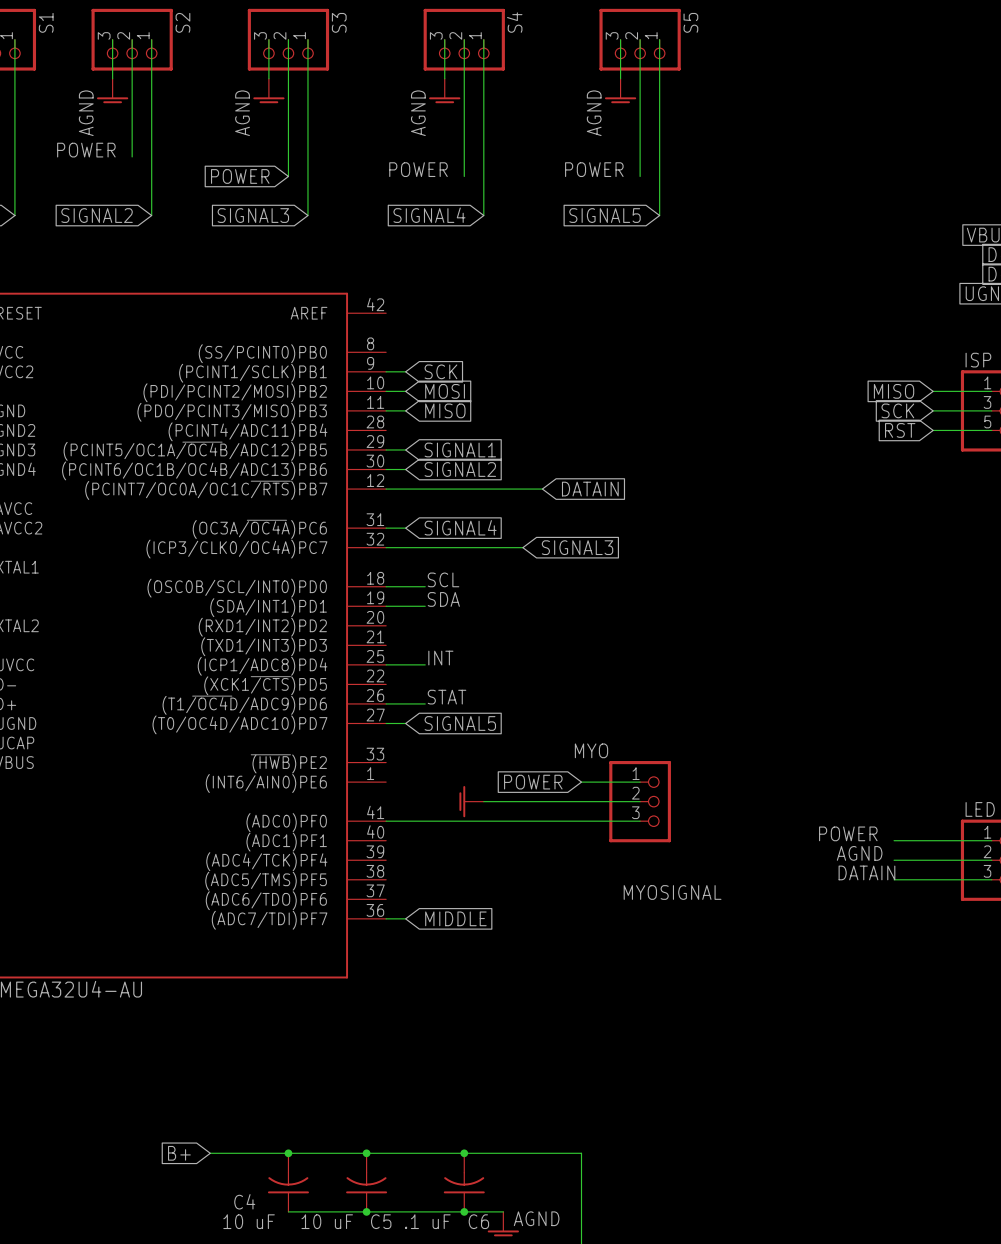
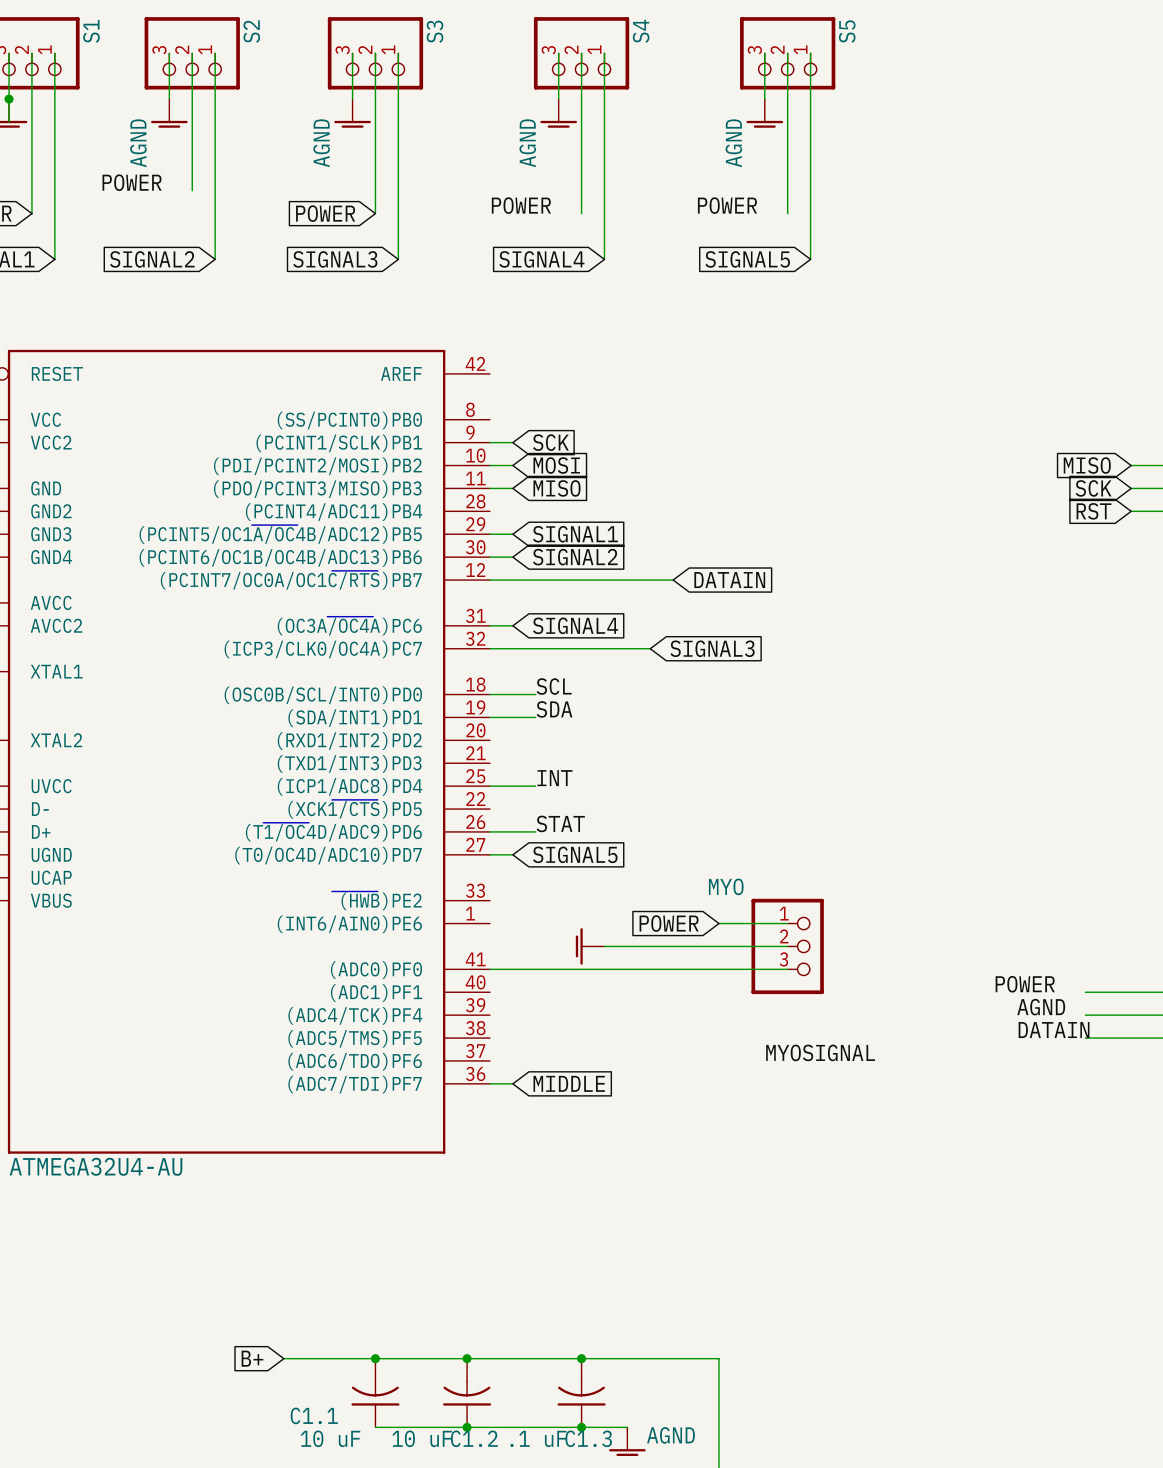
C4 name: C4 (244, 1201) -> C1.1 (314, 1415)
C5 name: C5 (381, 1221) -> C1.2 (474, 1438)
C6 name: C6 (478, 1221) -> C1.3 (588, 1438)

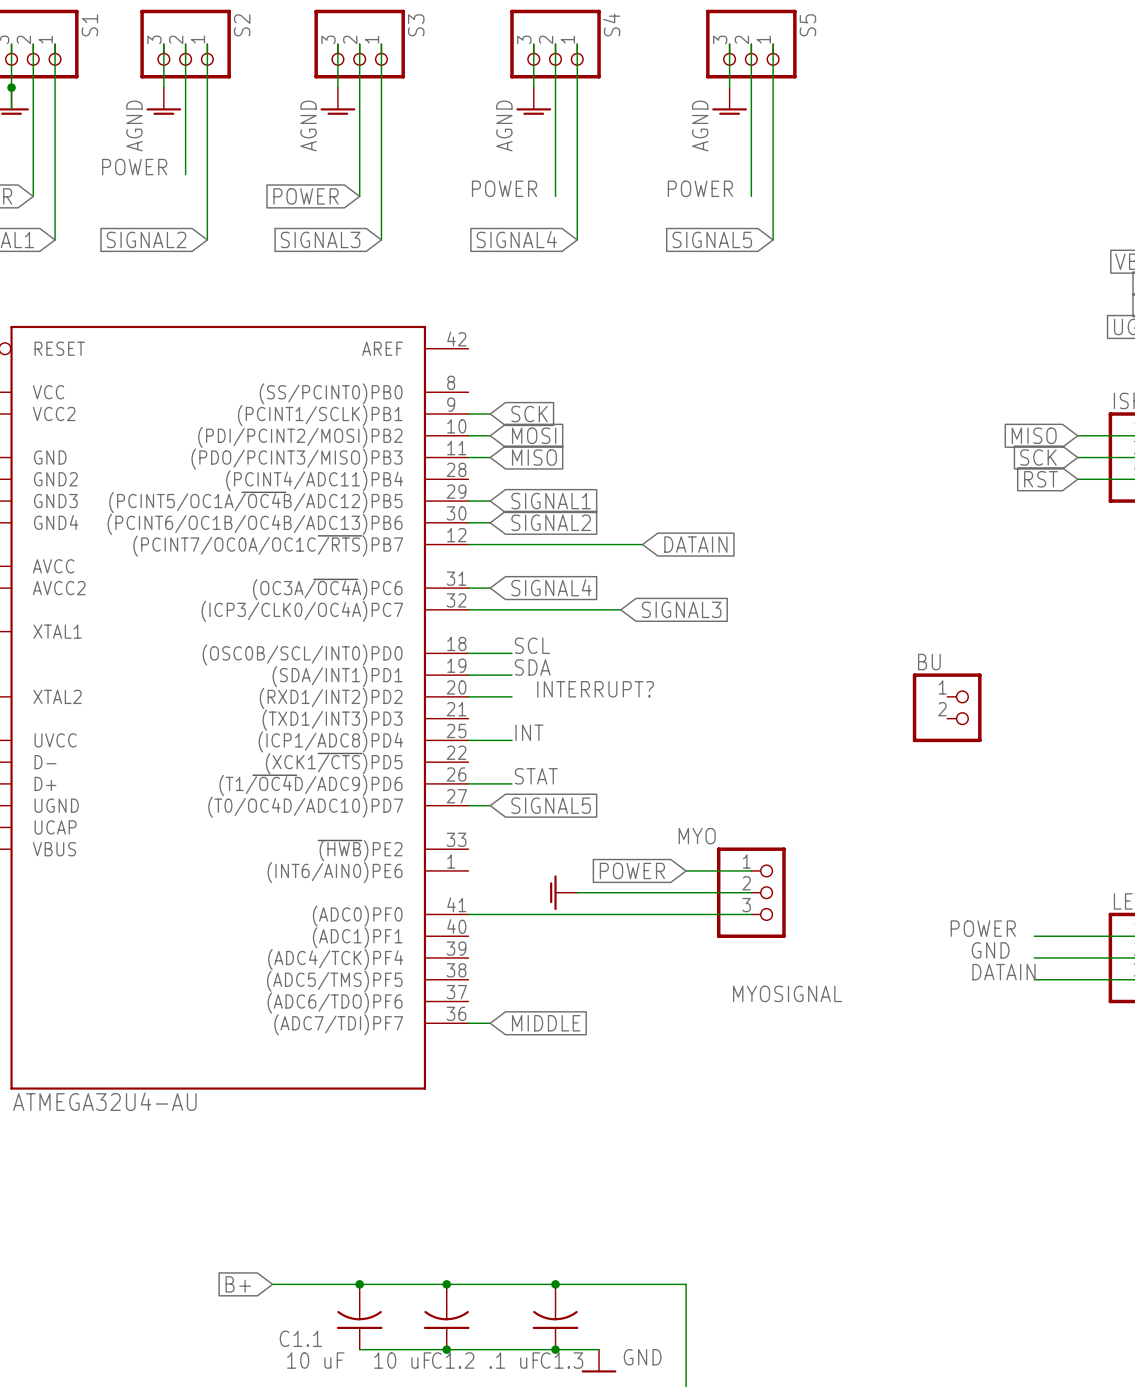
label: none -> INTERRUPT? (595, 689)
wire: none -> (468, 696) (512, 696)
BU: none -> (947, 707)
label: AGND (1041, 1007) -> GND (990, 950)
power symbol: AGND (627, 1441) -> GND (599, 1361)

